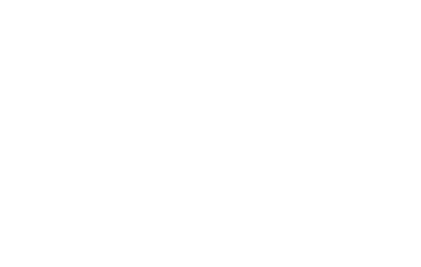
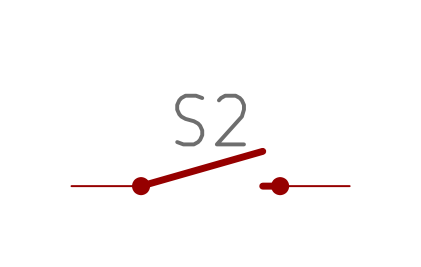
S2: none -> (210, 171)

